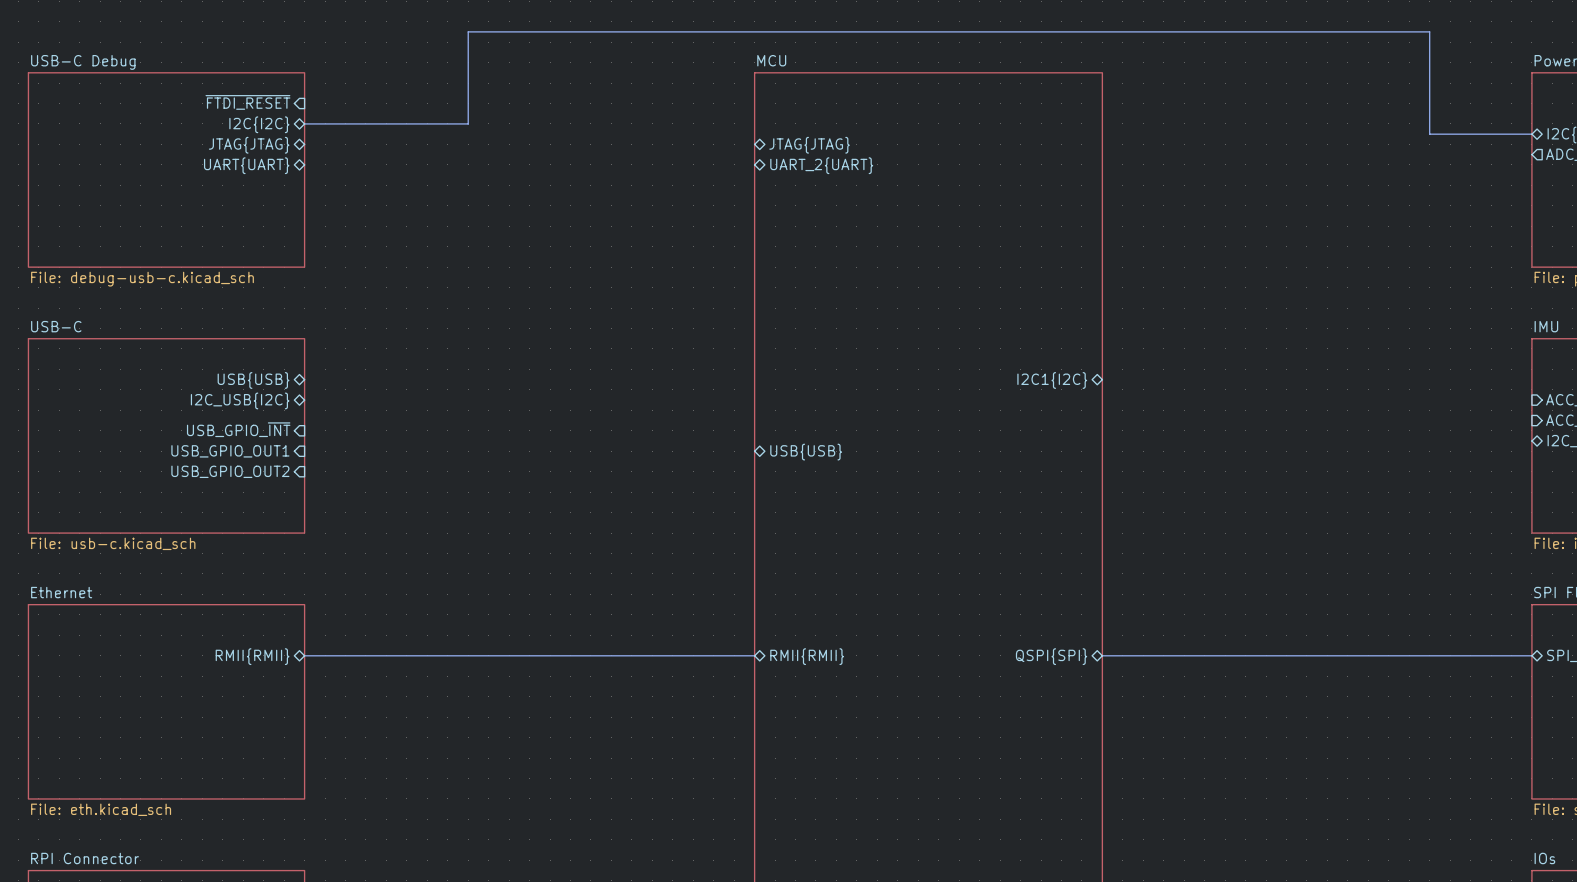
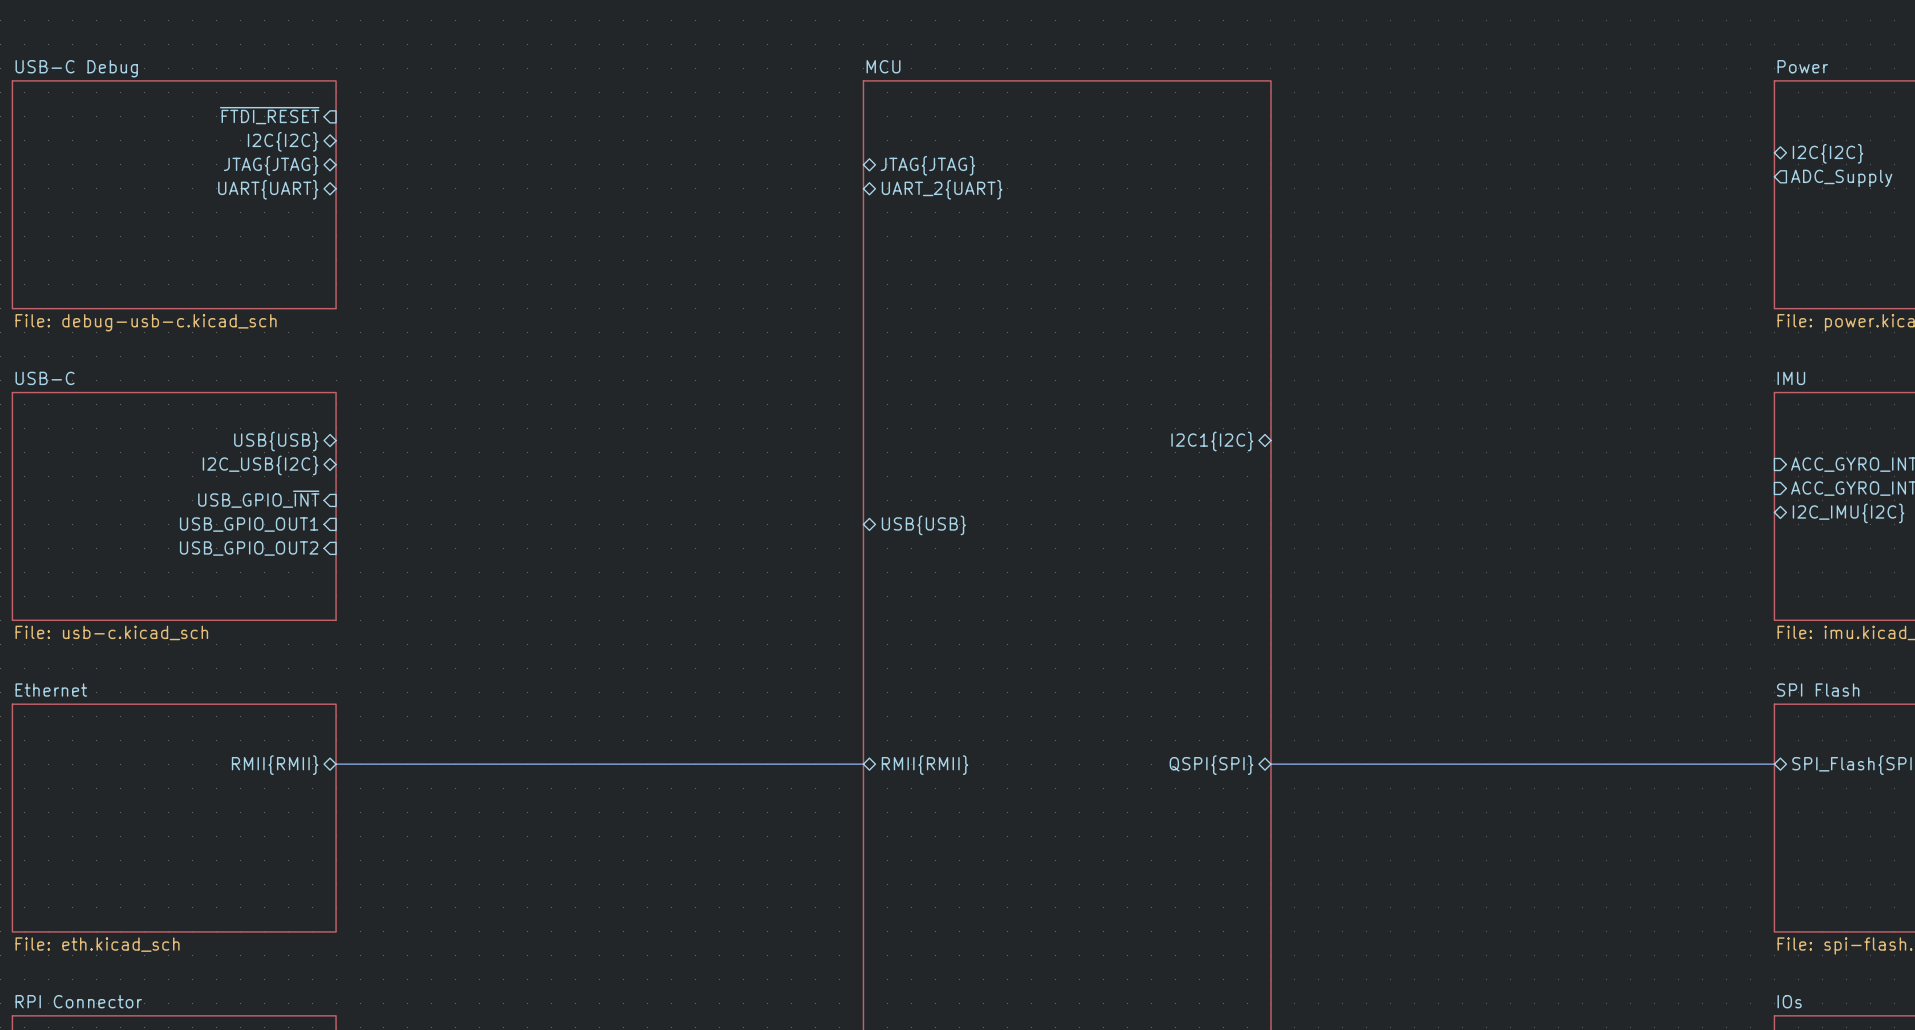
bus: (304, 123) (468, 123) (468, 31) (1429, 31) (1429, 134) (1531, 134) -> none

